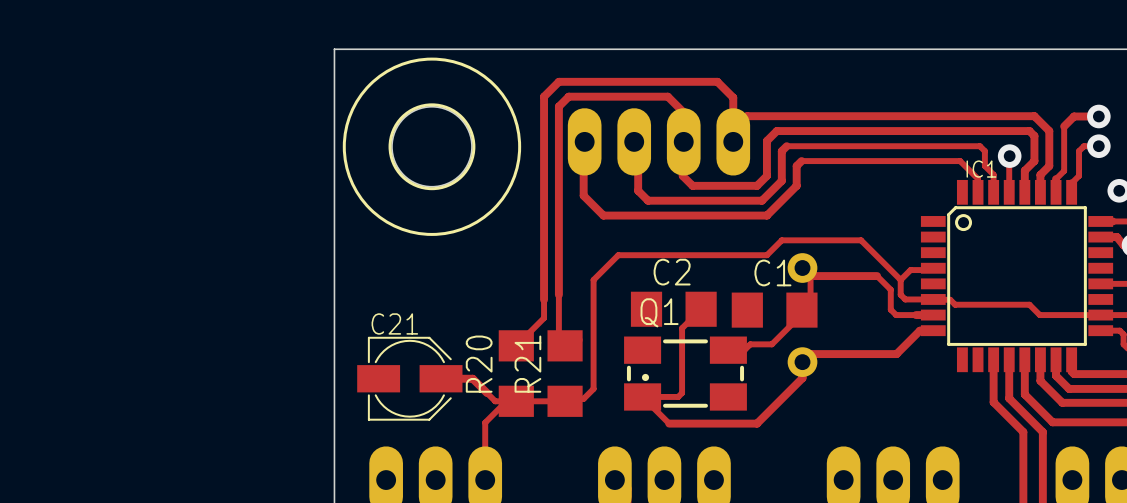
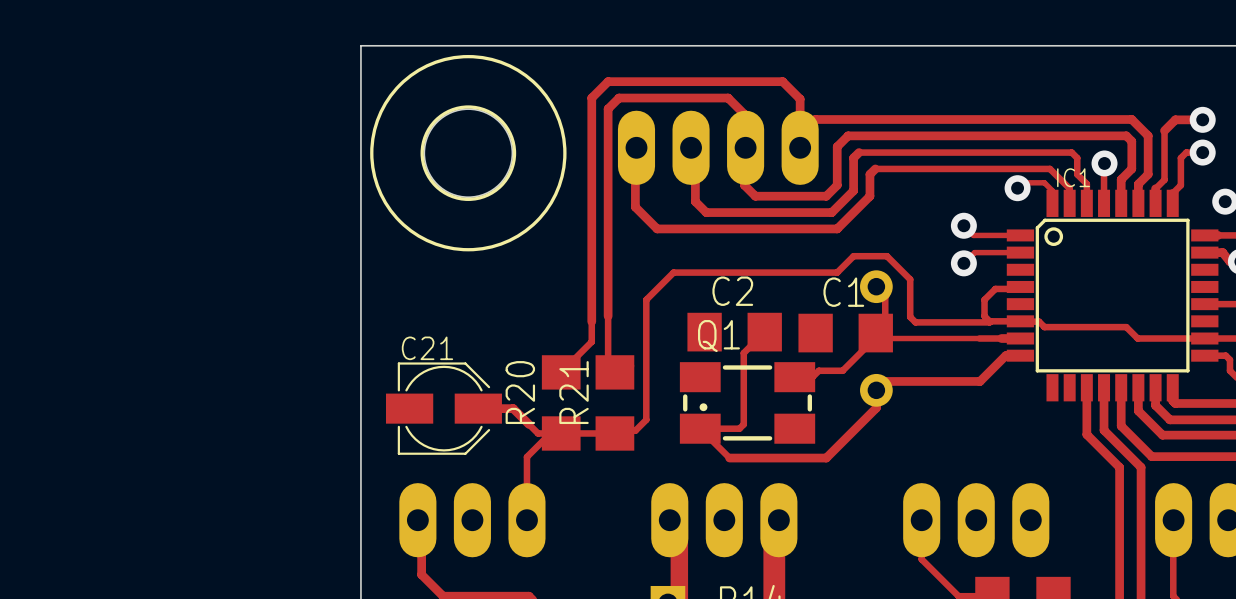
track: none -> (1017, 188) (1022, 182) (1044, 182) (1052, 190) (1052, 203)
via: none -> (1017, 188)
track: none -> (963, 225) (973, 235) (1020, 235)
via: none -> (963, 225)
track: none -> (1020, 252) (974, 252) (963, 263)
track: (812, 240) (861, 240) (900, 279) -> (886, 256) (910, 279) (910, 317) (915, 322) (990, 321)
via: none -> (963, 263)
track: (810, 276) (877, 276) (890, 289) (890, 309) (896, 315) -> (875, 333) (881, 338) (979, 338)

